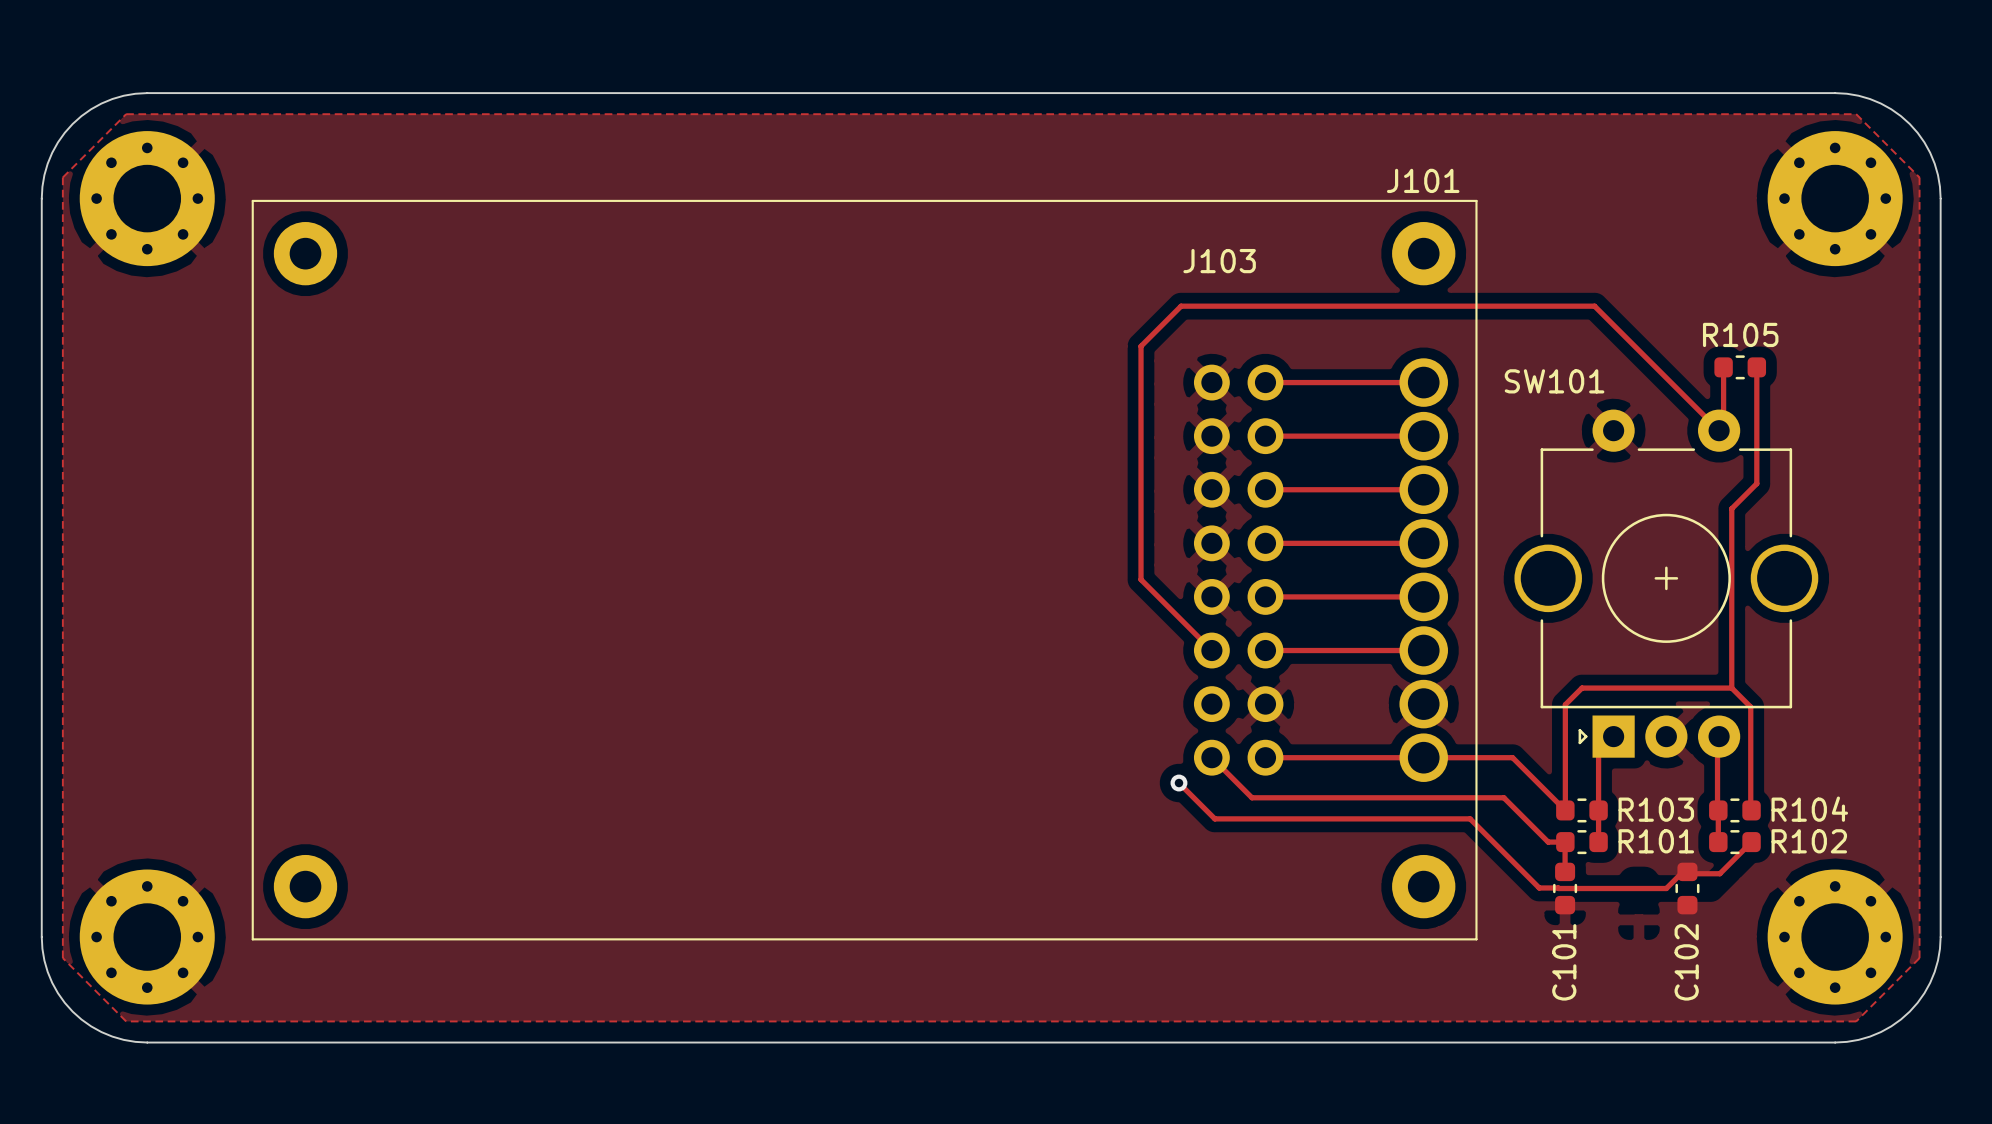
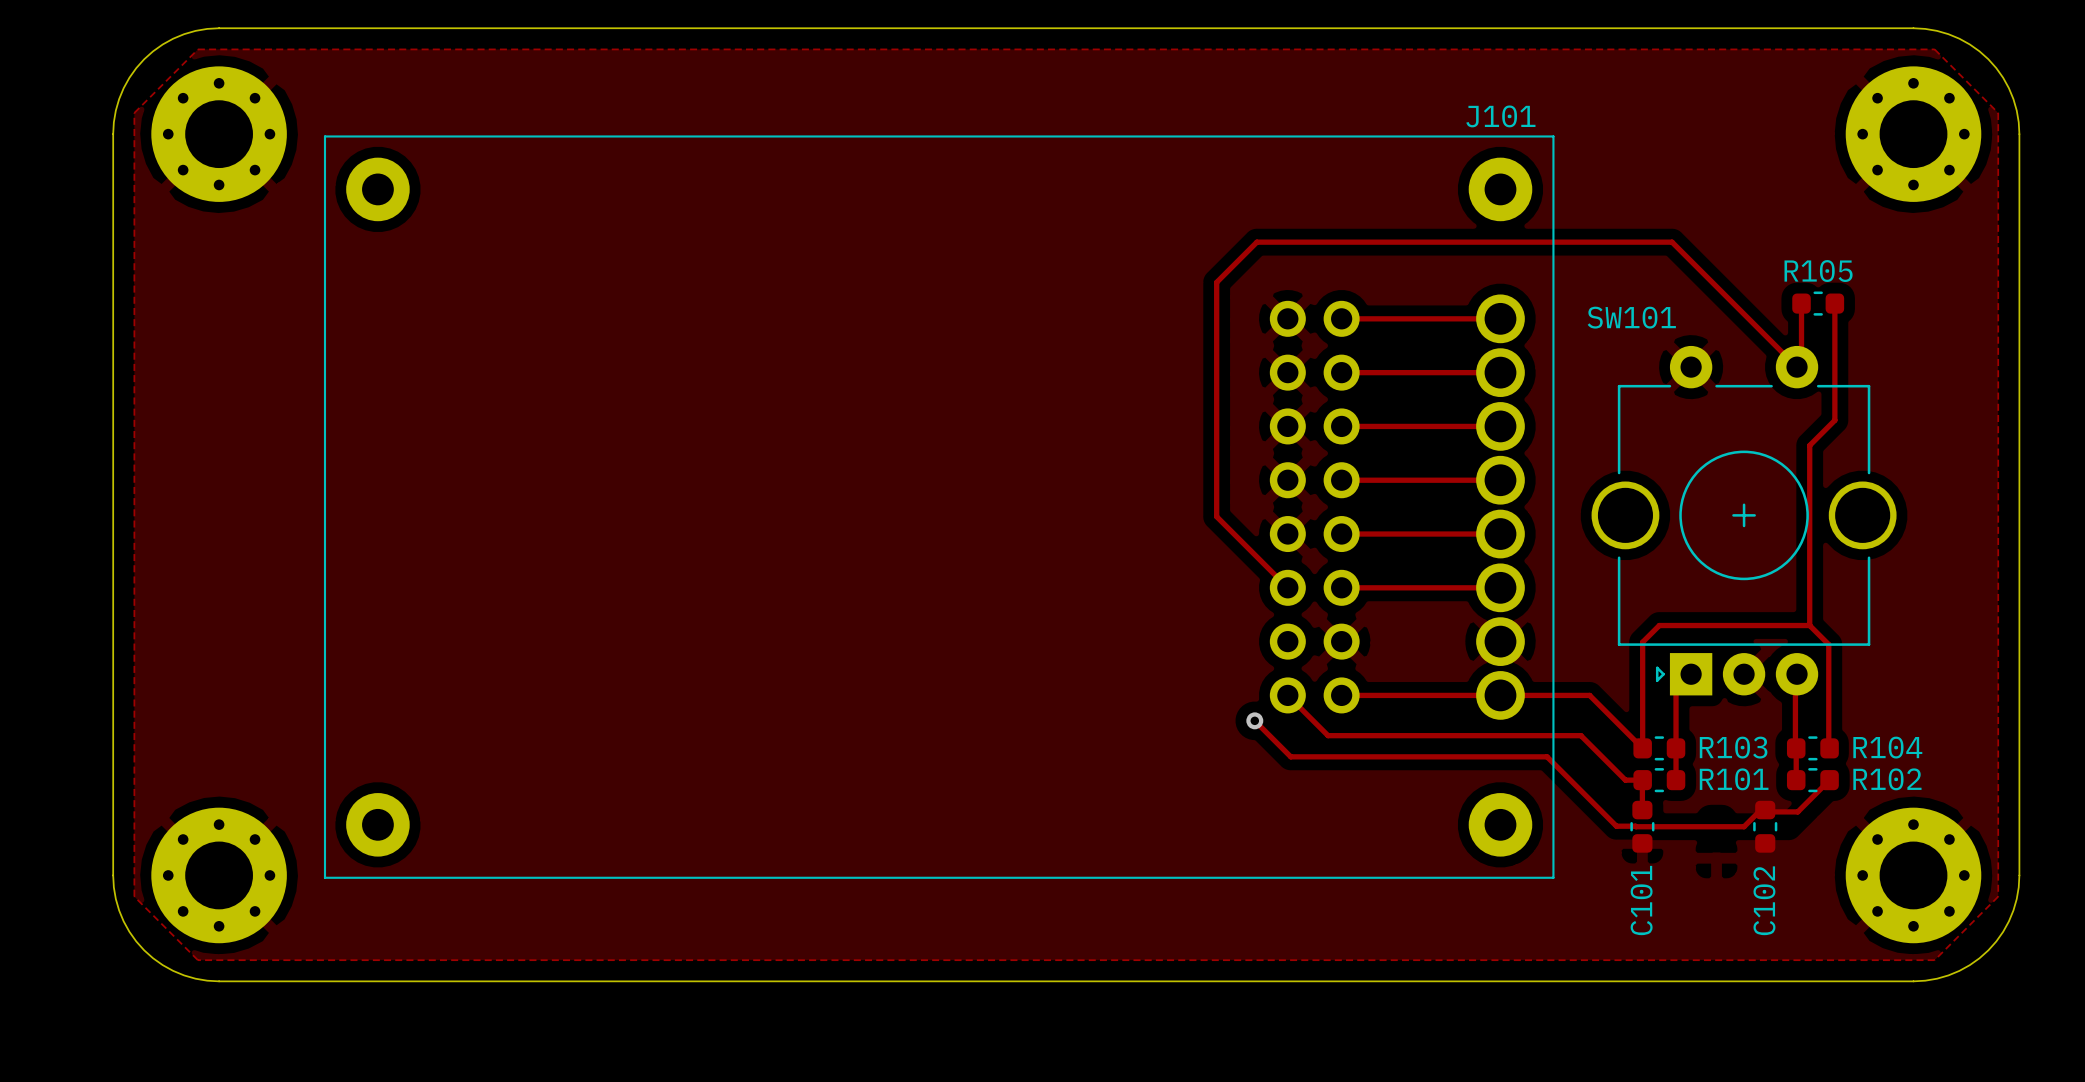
J103: (1219, 261) -> none

